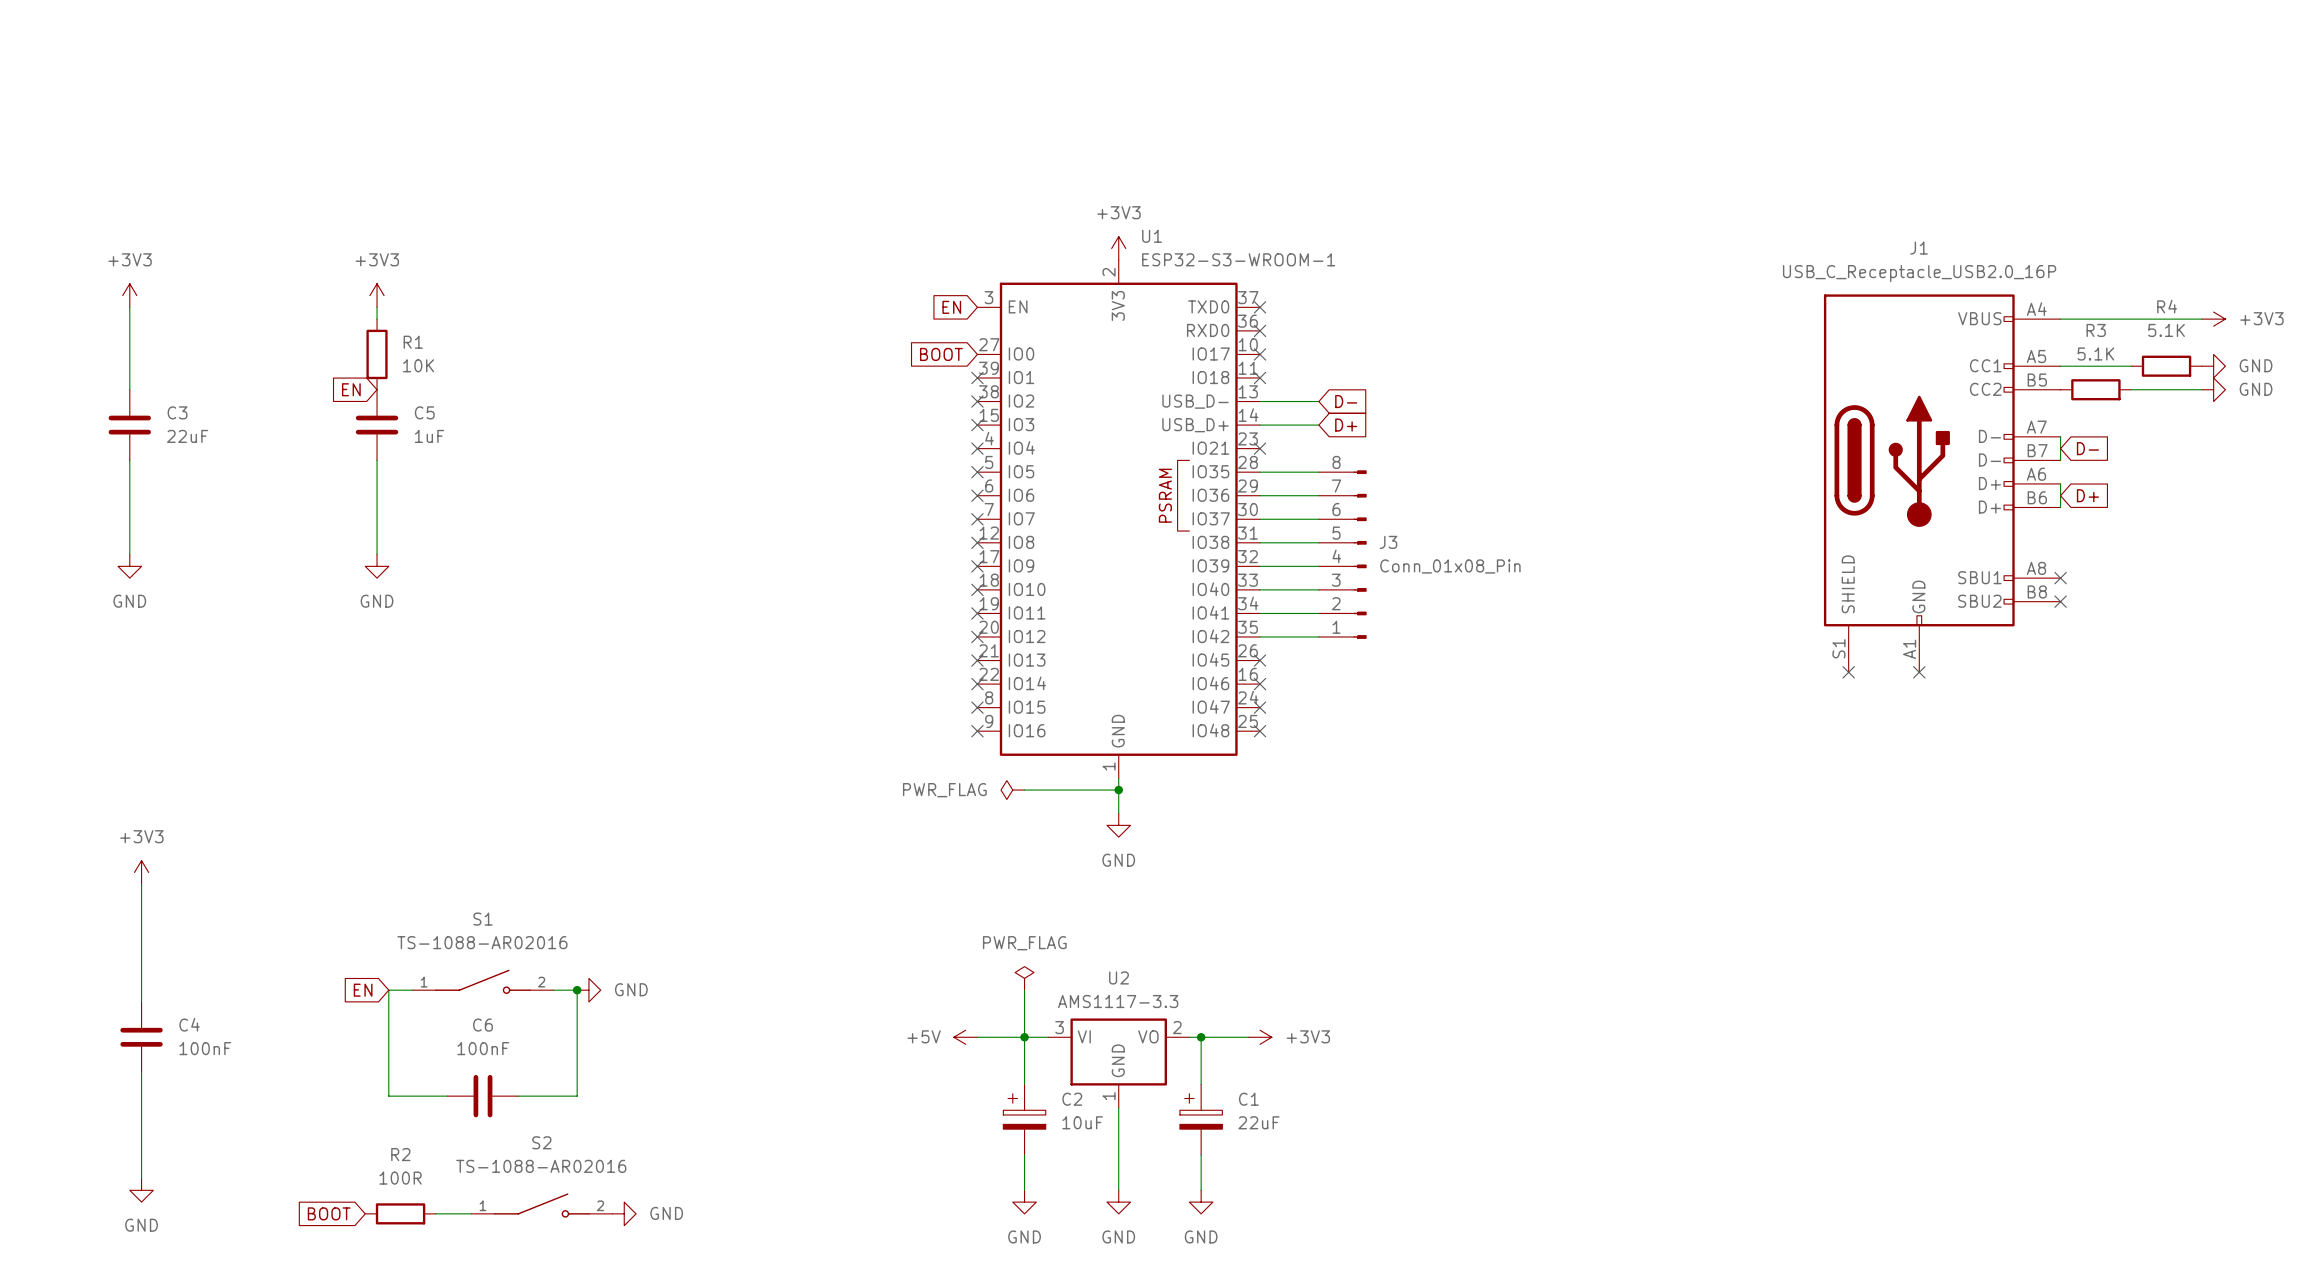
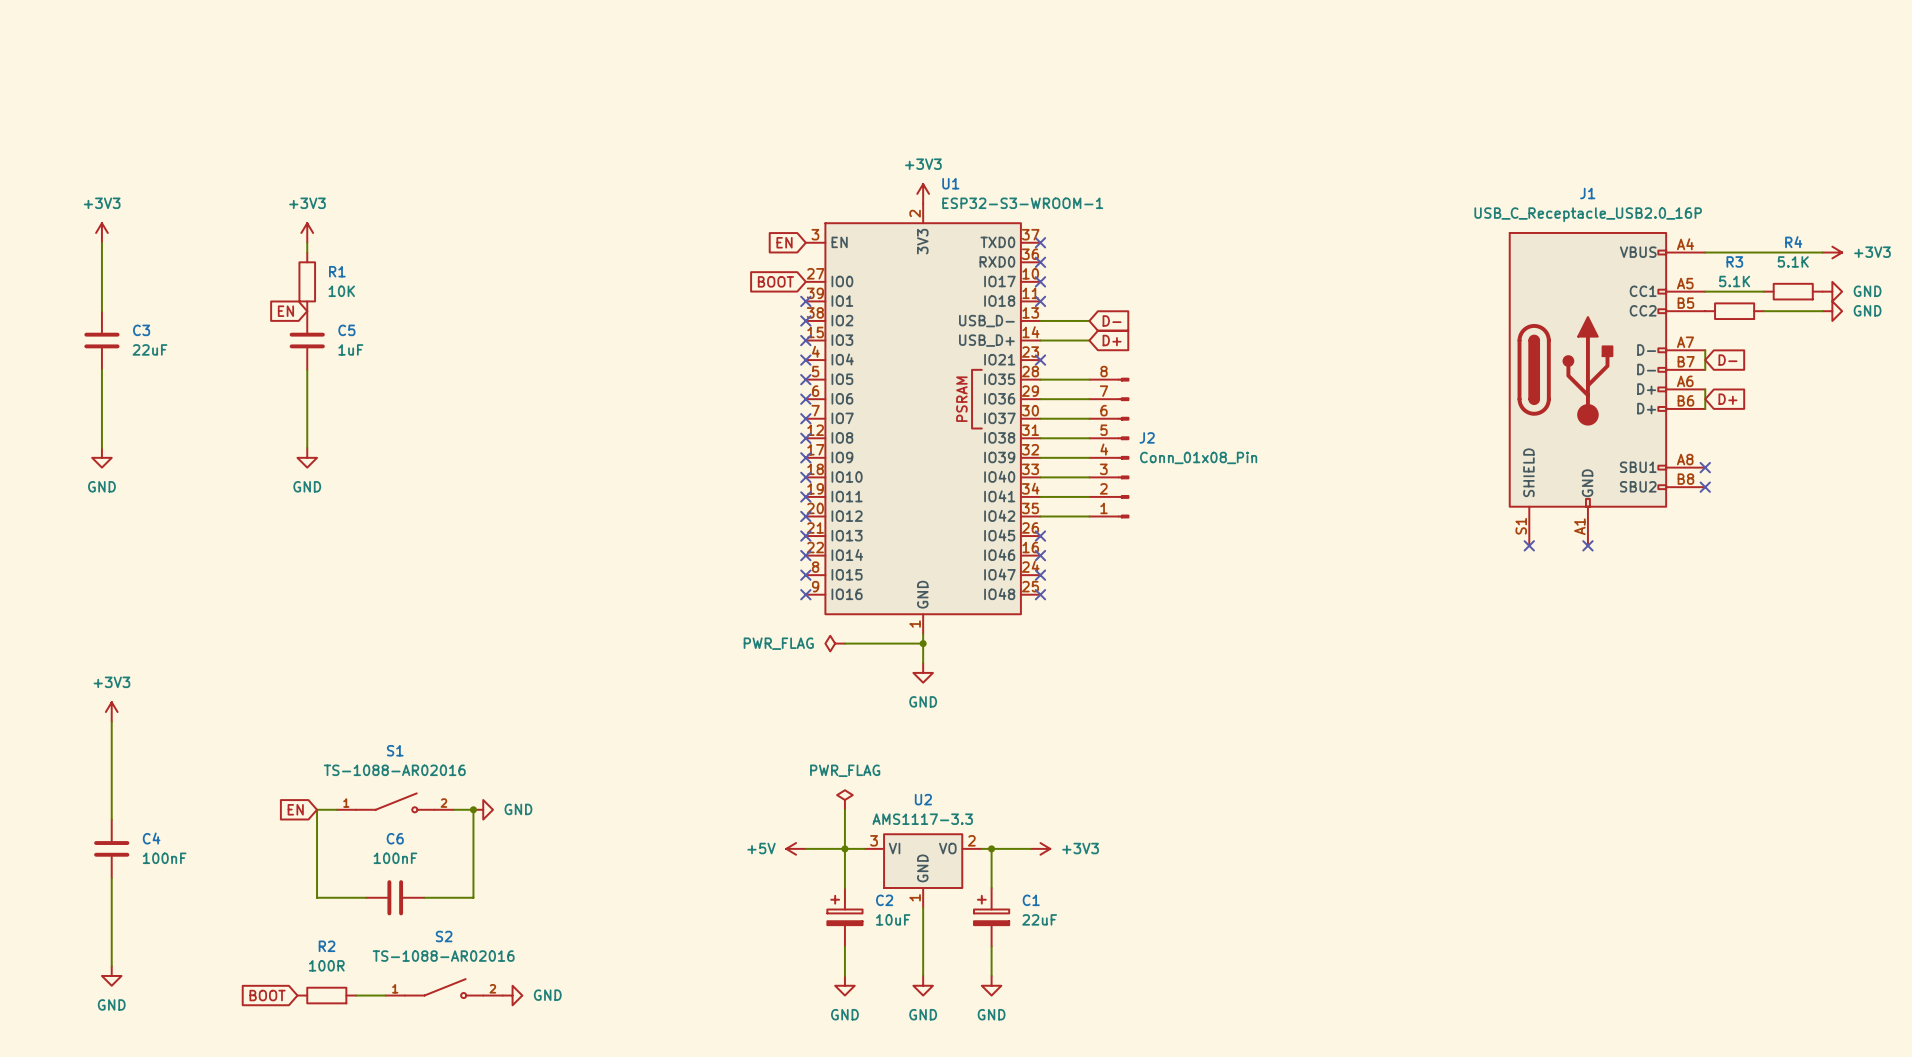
J3 name: J3 (1388, 542) -> J2 (1147, 437)

